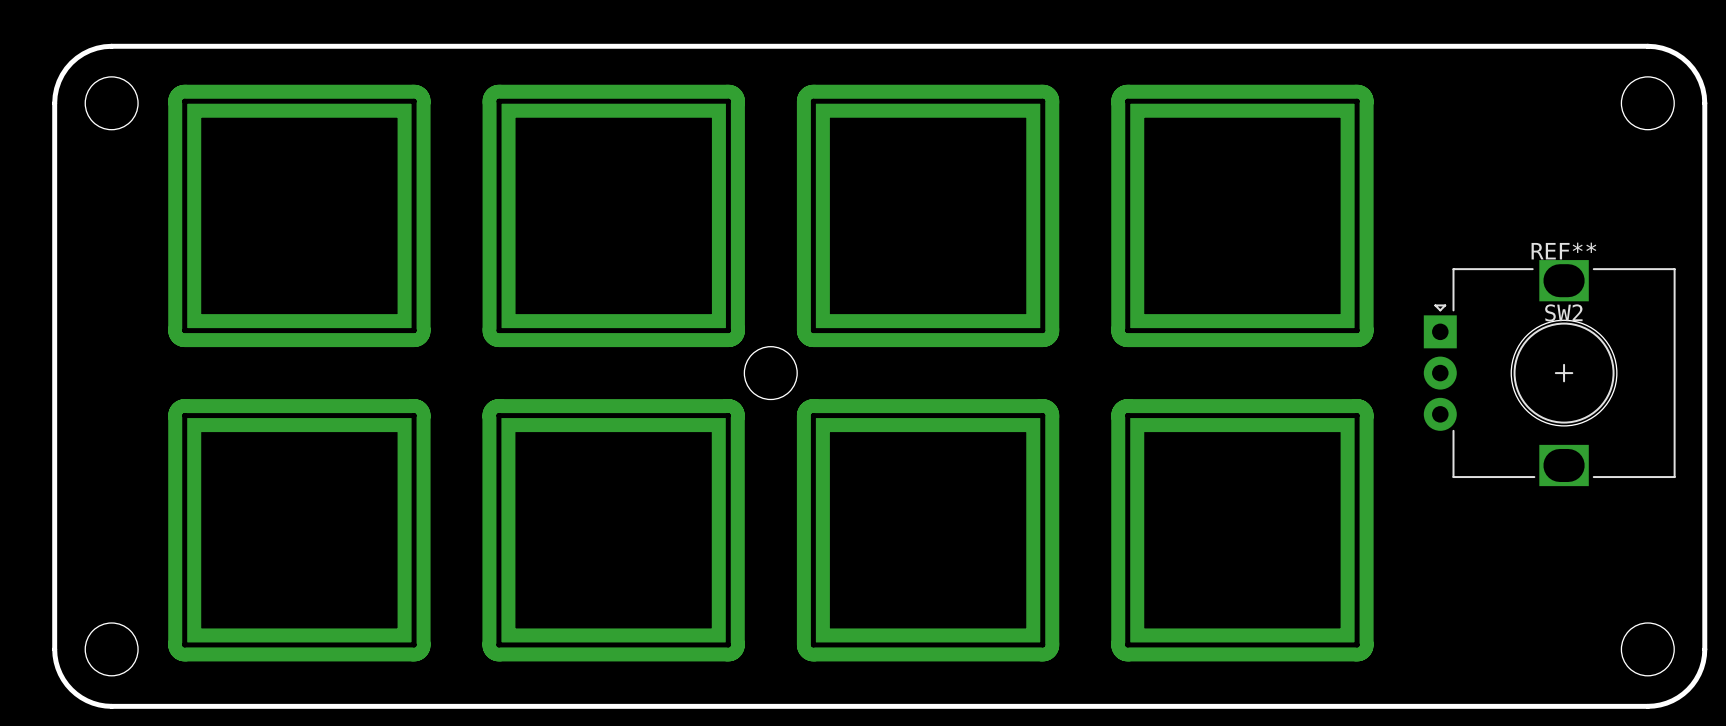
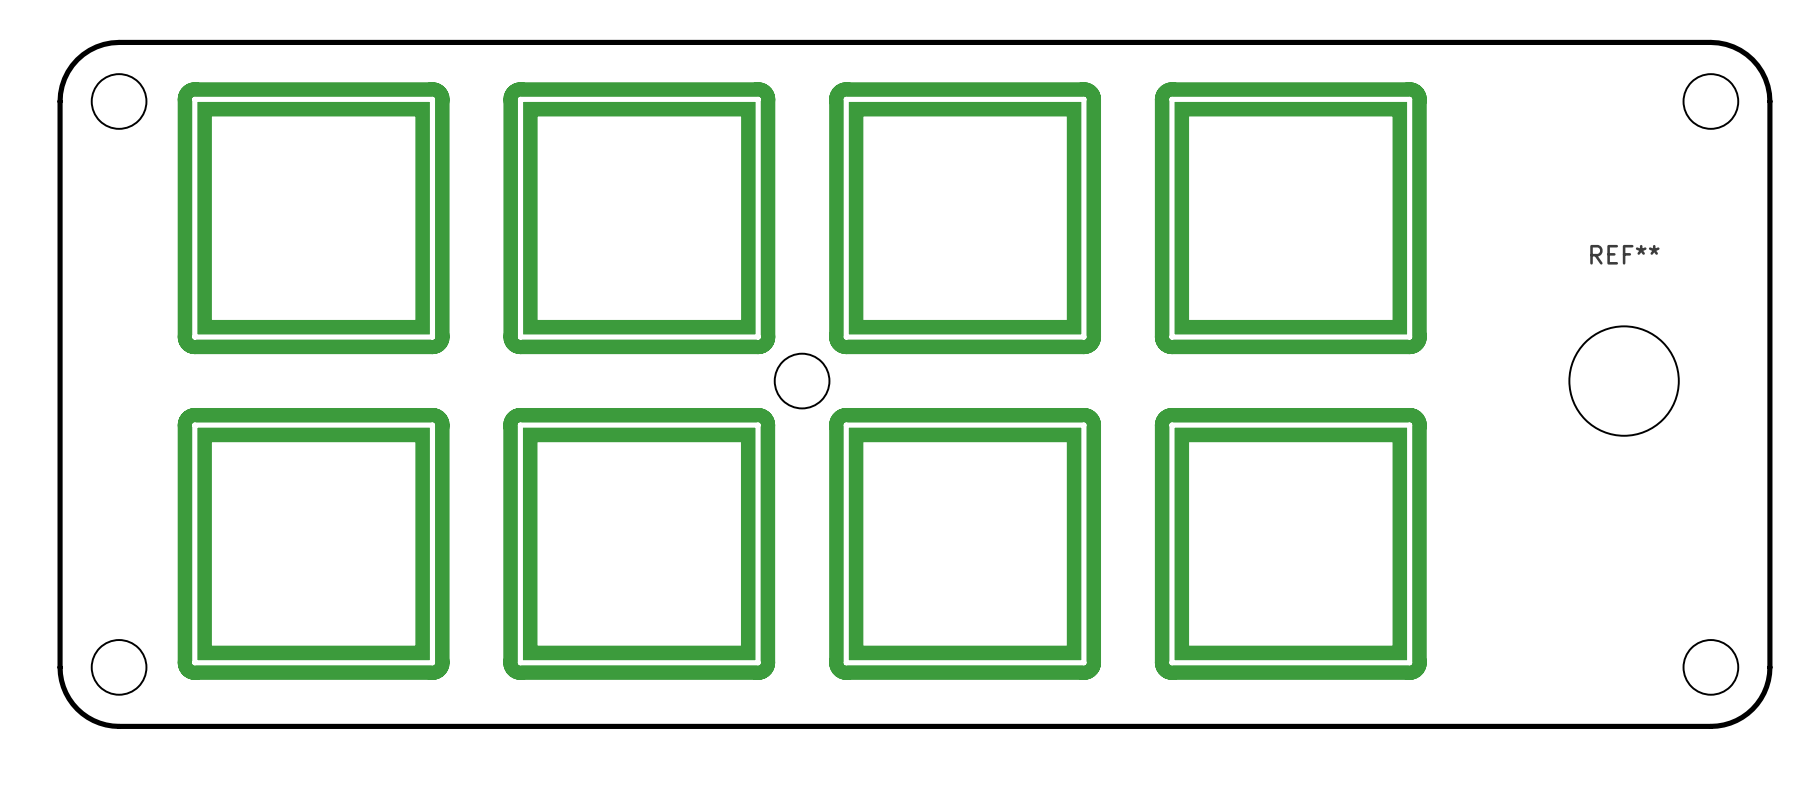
SW2: (1549, 373) -> none

